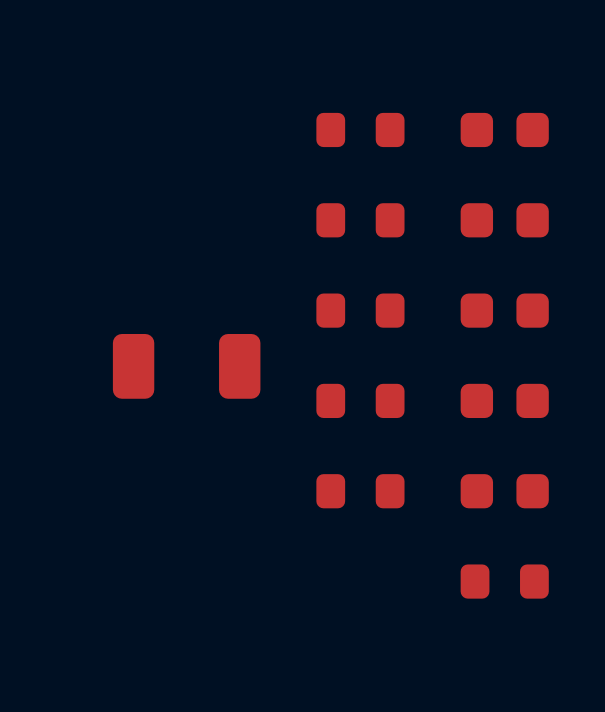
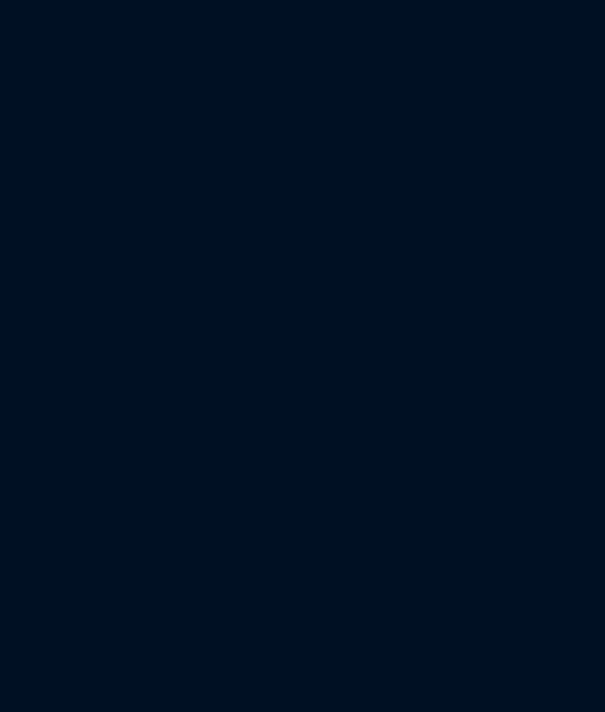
part: (360, 129) -> none
part: (504, 129) -> none
part: (360, 220) -> none
part: (504, 220) -> none
part: (360, 310) -> none
part: (504, 310) -> none
part: (186, 366) -> none
part: (360, 400) -> none
part: (504, 400) -> none
part: (360, 491) -> none
part: (504, 491) -> none
part: (504, 581) -> none

